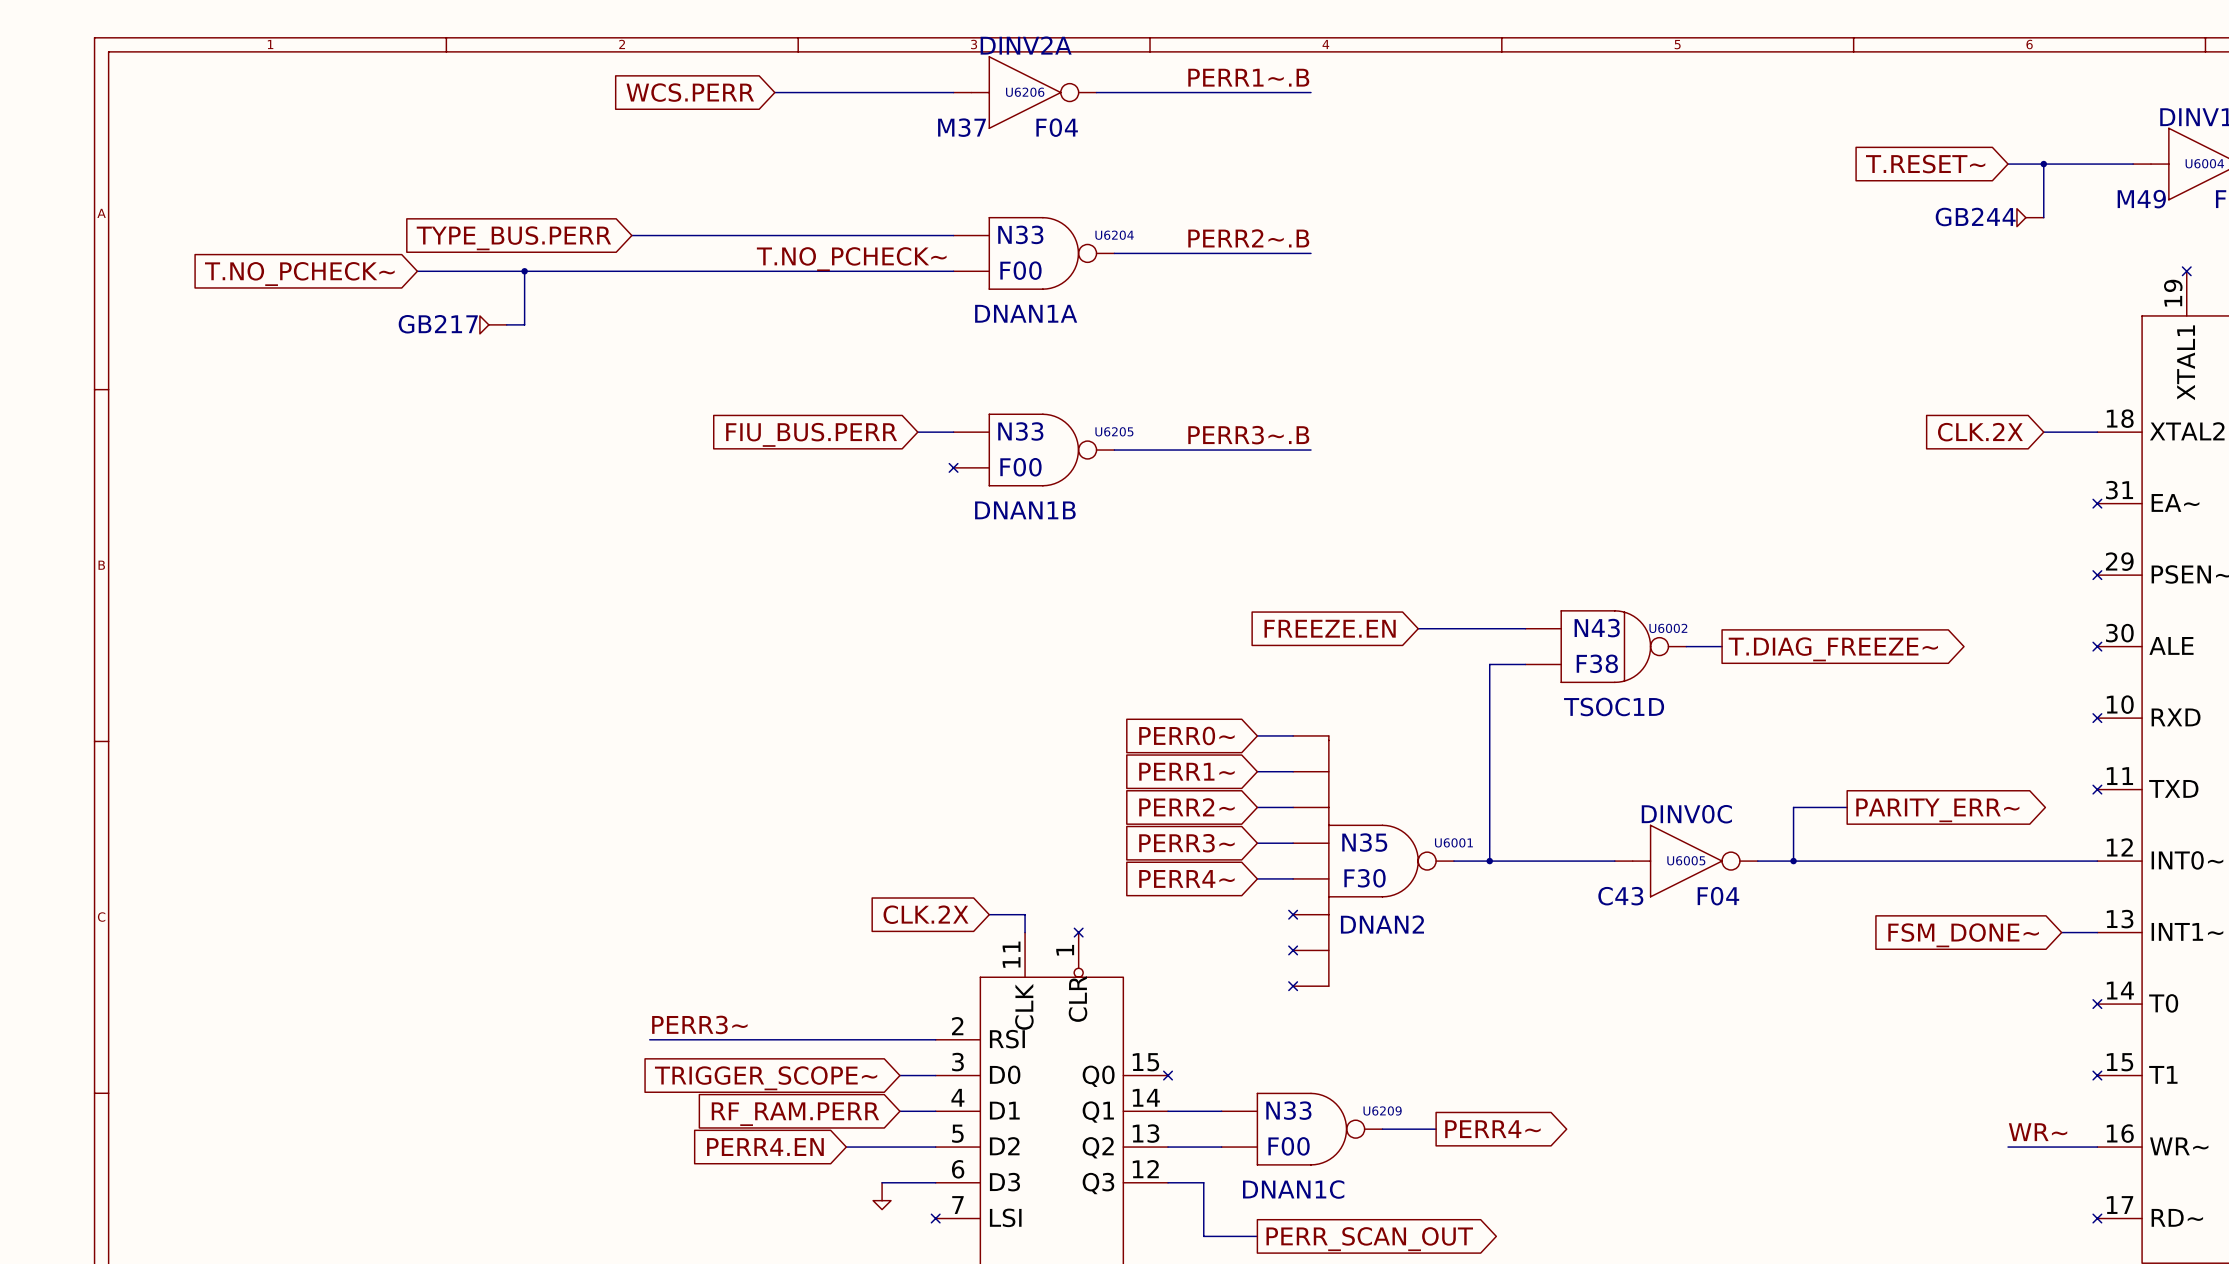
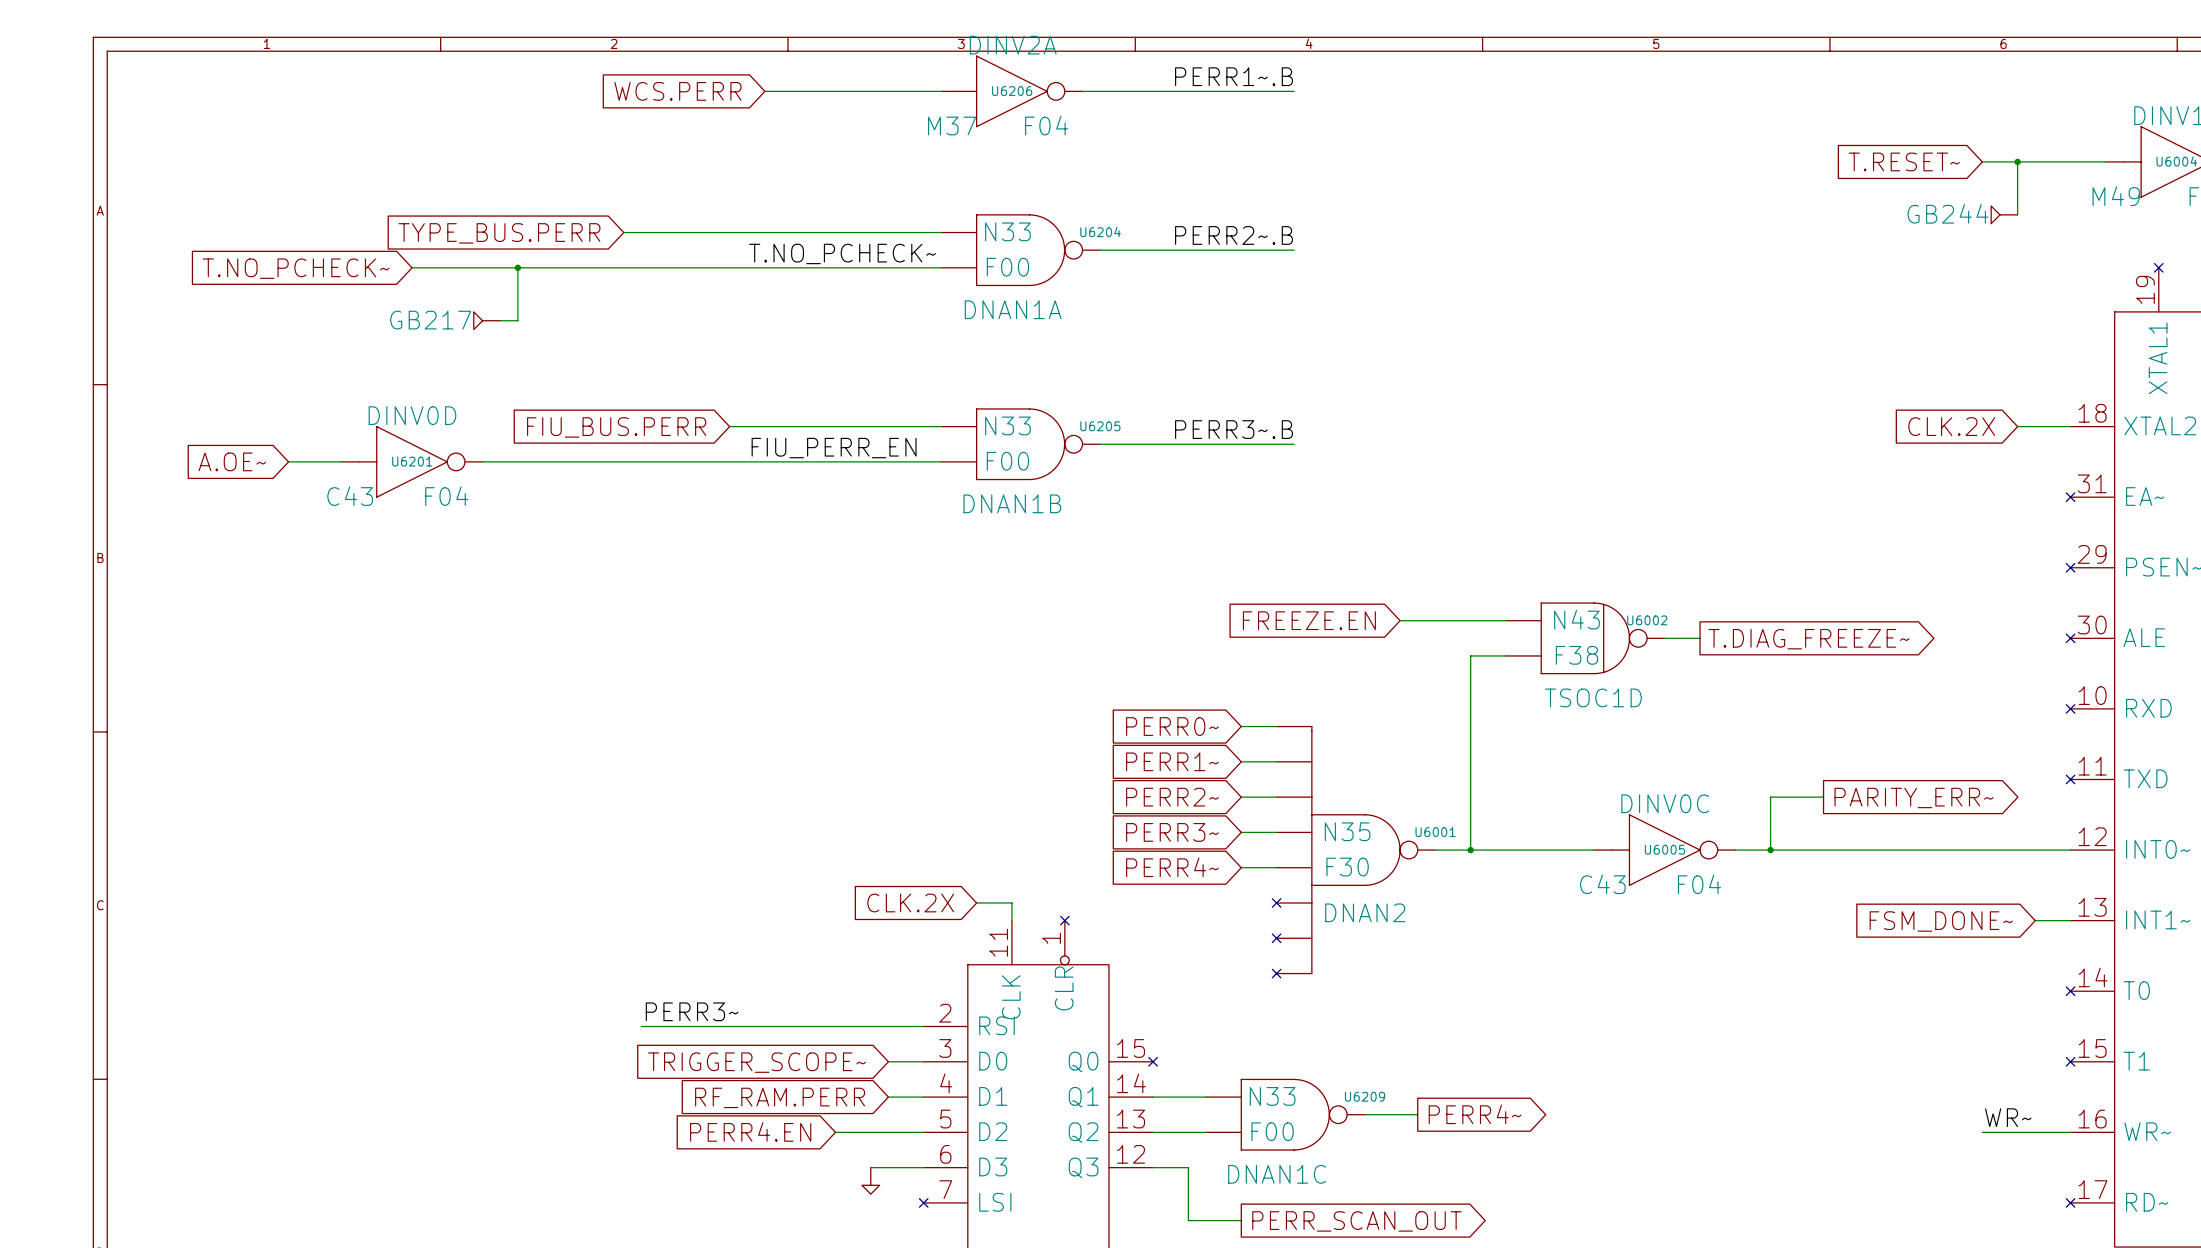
wire: none -> (729, 426) (906, 426)
global label: none -> FIU_BUS.PERR (616, 427)
global label: FIU_BUS.PERR (811, 434) -> none
label: none -> FIU_PERR_EN (834, 448)
global label: none -> A.OE~ (232, 461)
wire: none -> (288, 461) (341, 461)
U6201: none -> F04 (412, 461)
wire: none -> (482, 461) (941, 461)
no-connect mark: (953, 467) -> none

